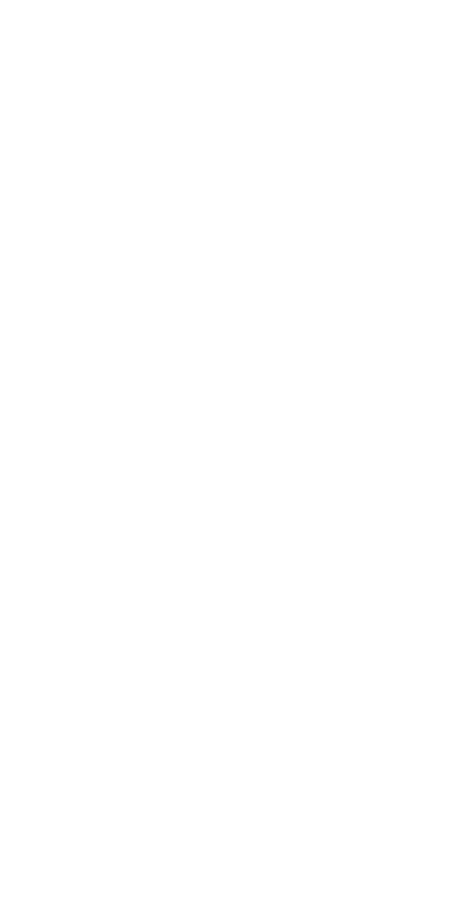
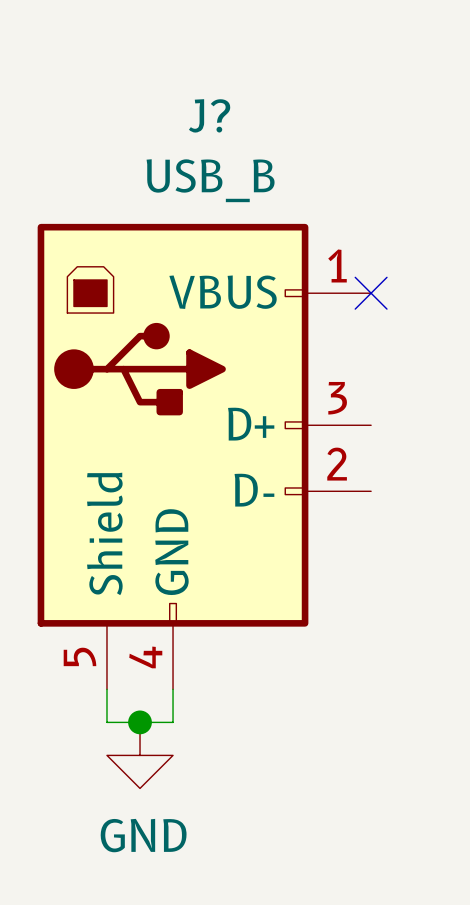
no-connect mark: none -> (371, 293)
J?: none -> USB_B (204, 456)
wire: none -> (106, 689) (106, 722) (173, 722) (173, 689)
junction: none -> (140, 722)
power symbol: none -> GND (140, 755)

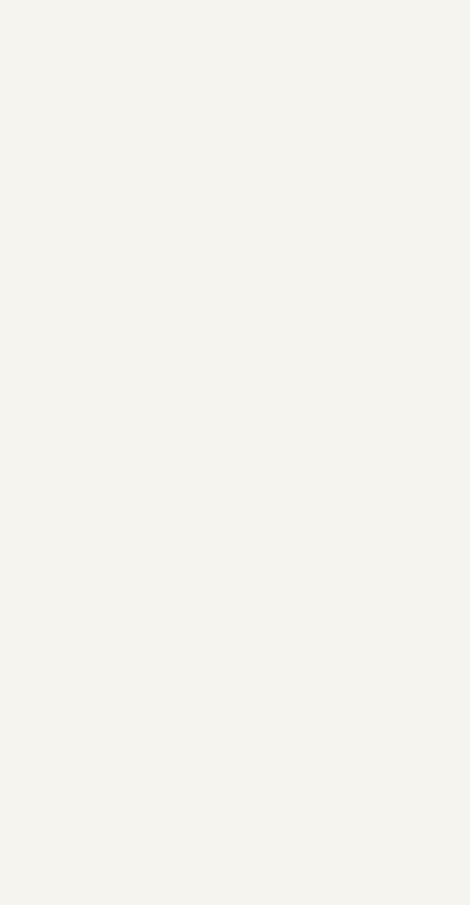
no-connect mark: (371, 293) -> none
J?: USB_B (204, 456) -> none
wire: (106, 689) (106, 722) (173, 722) (173, 689) -> none
junction: (140, 722) -> none
power symbol: GND (140, 755) -> none

